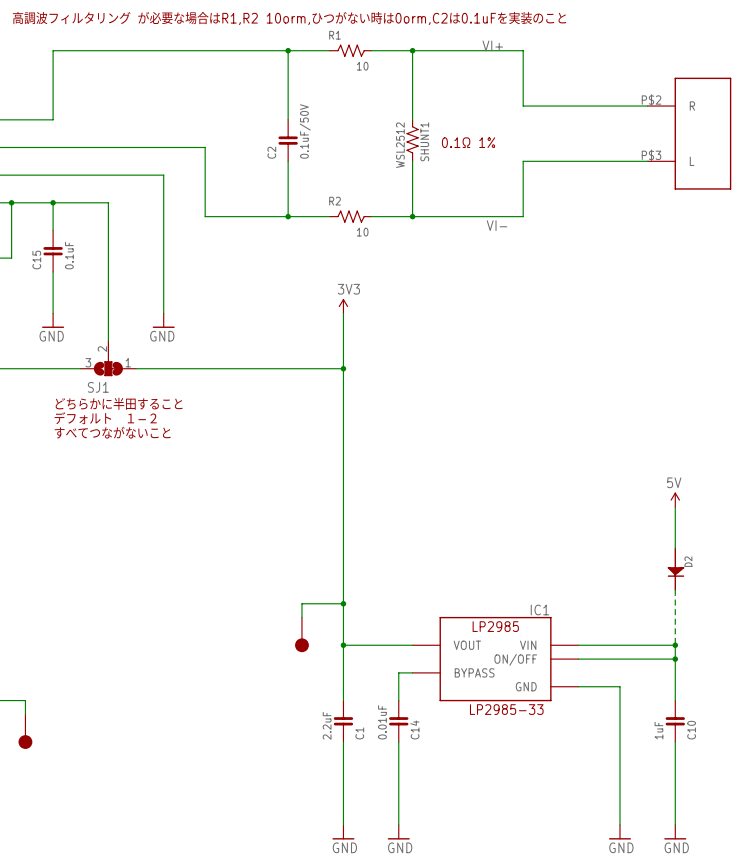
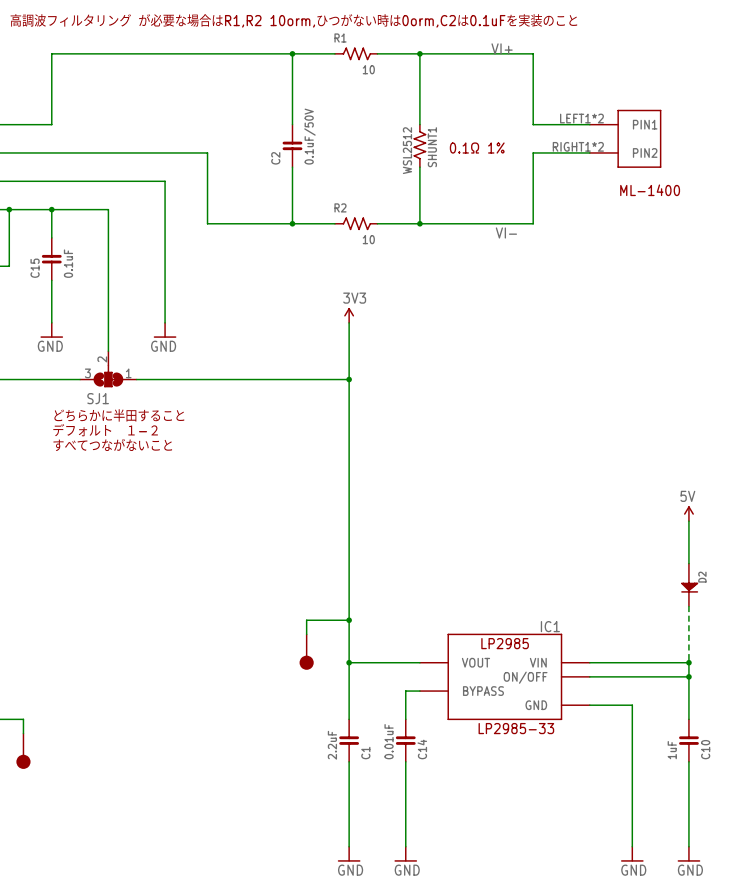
wire: (523, 106) (647, 106) -> (533, 110) (533, 124) (589, 124)
part: none -> (625, 138)
part: (689, 133) -> none
wire: (523, 161) (647, 161) -> (533, 167) (533, 152) (589, 152)
text: none -> ML-1400 (650, 190)

